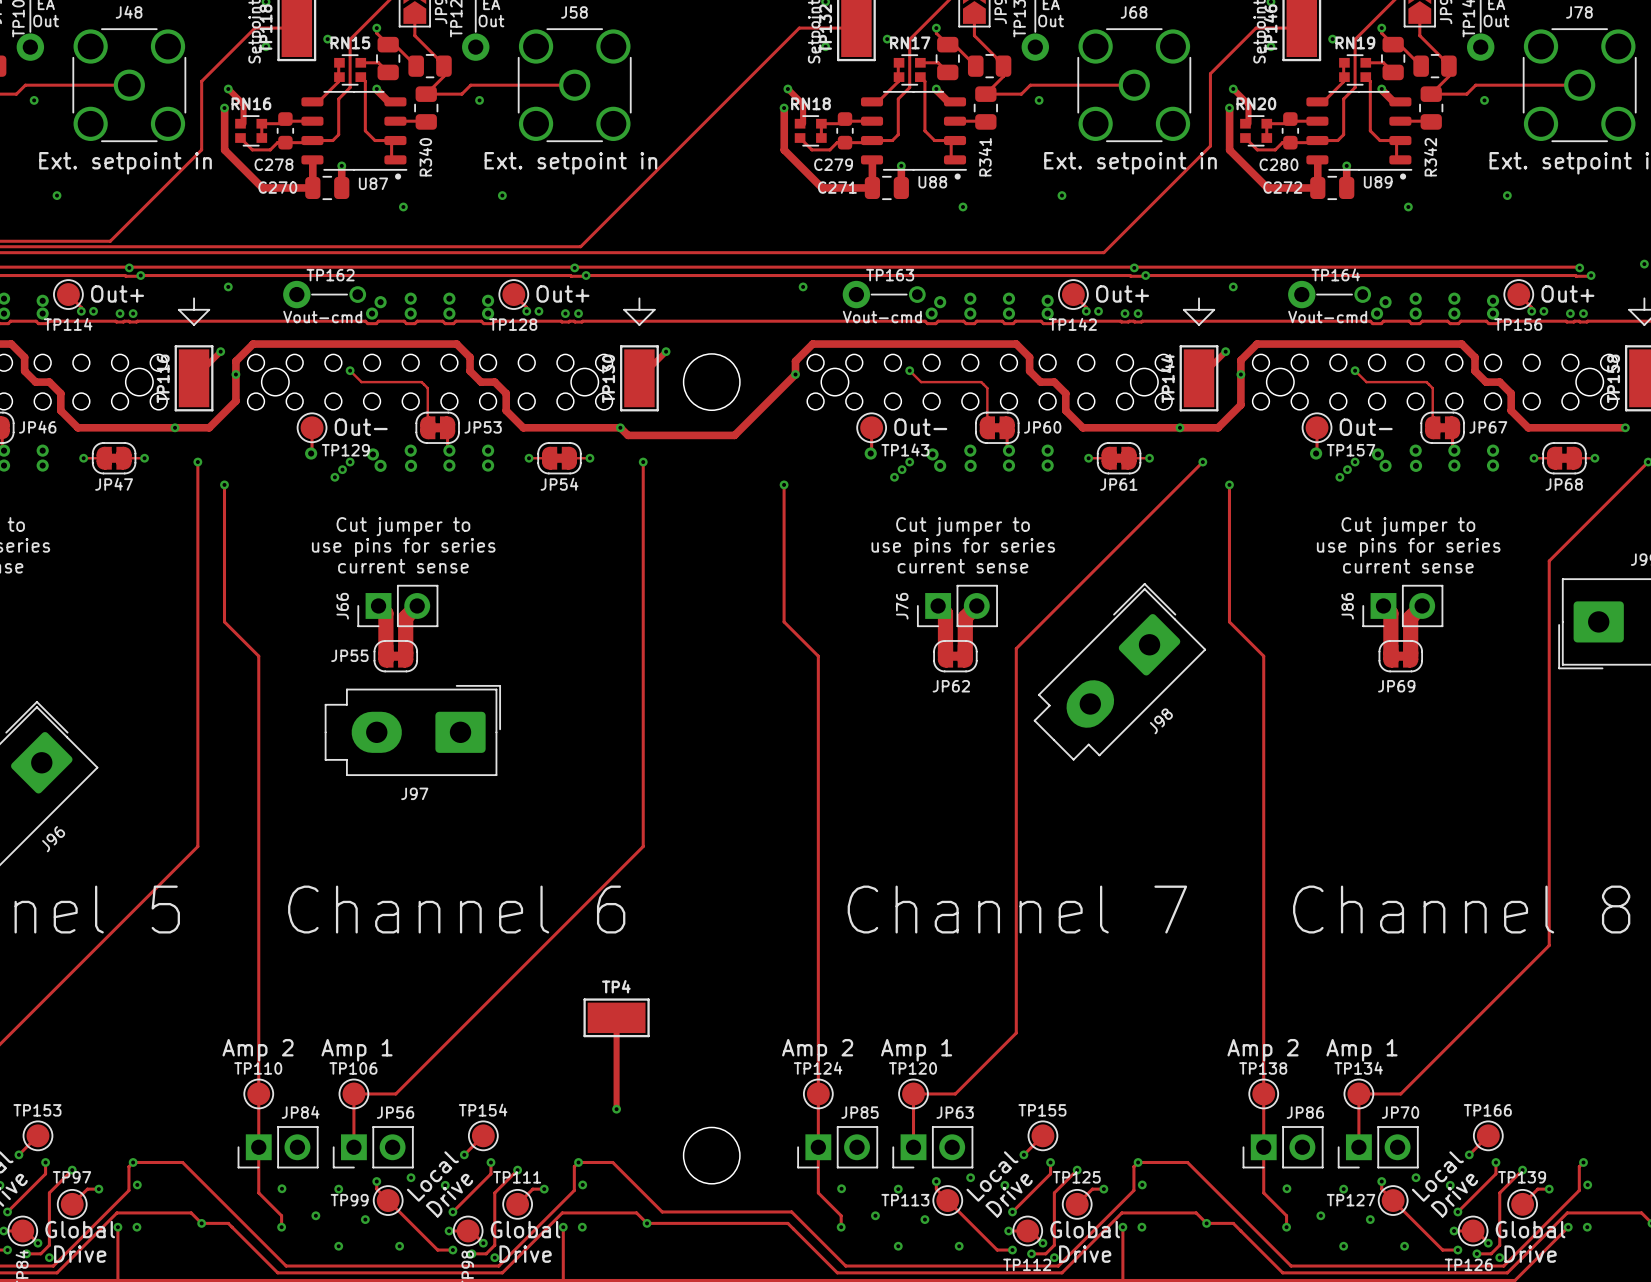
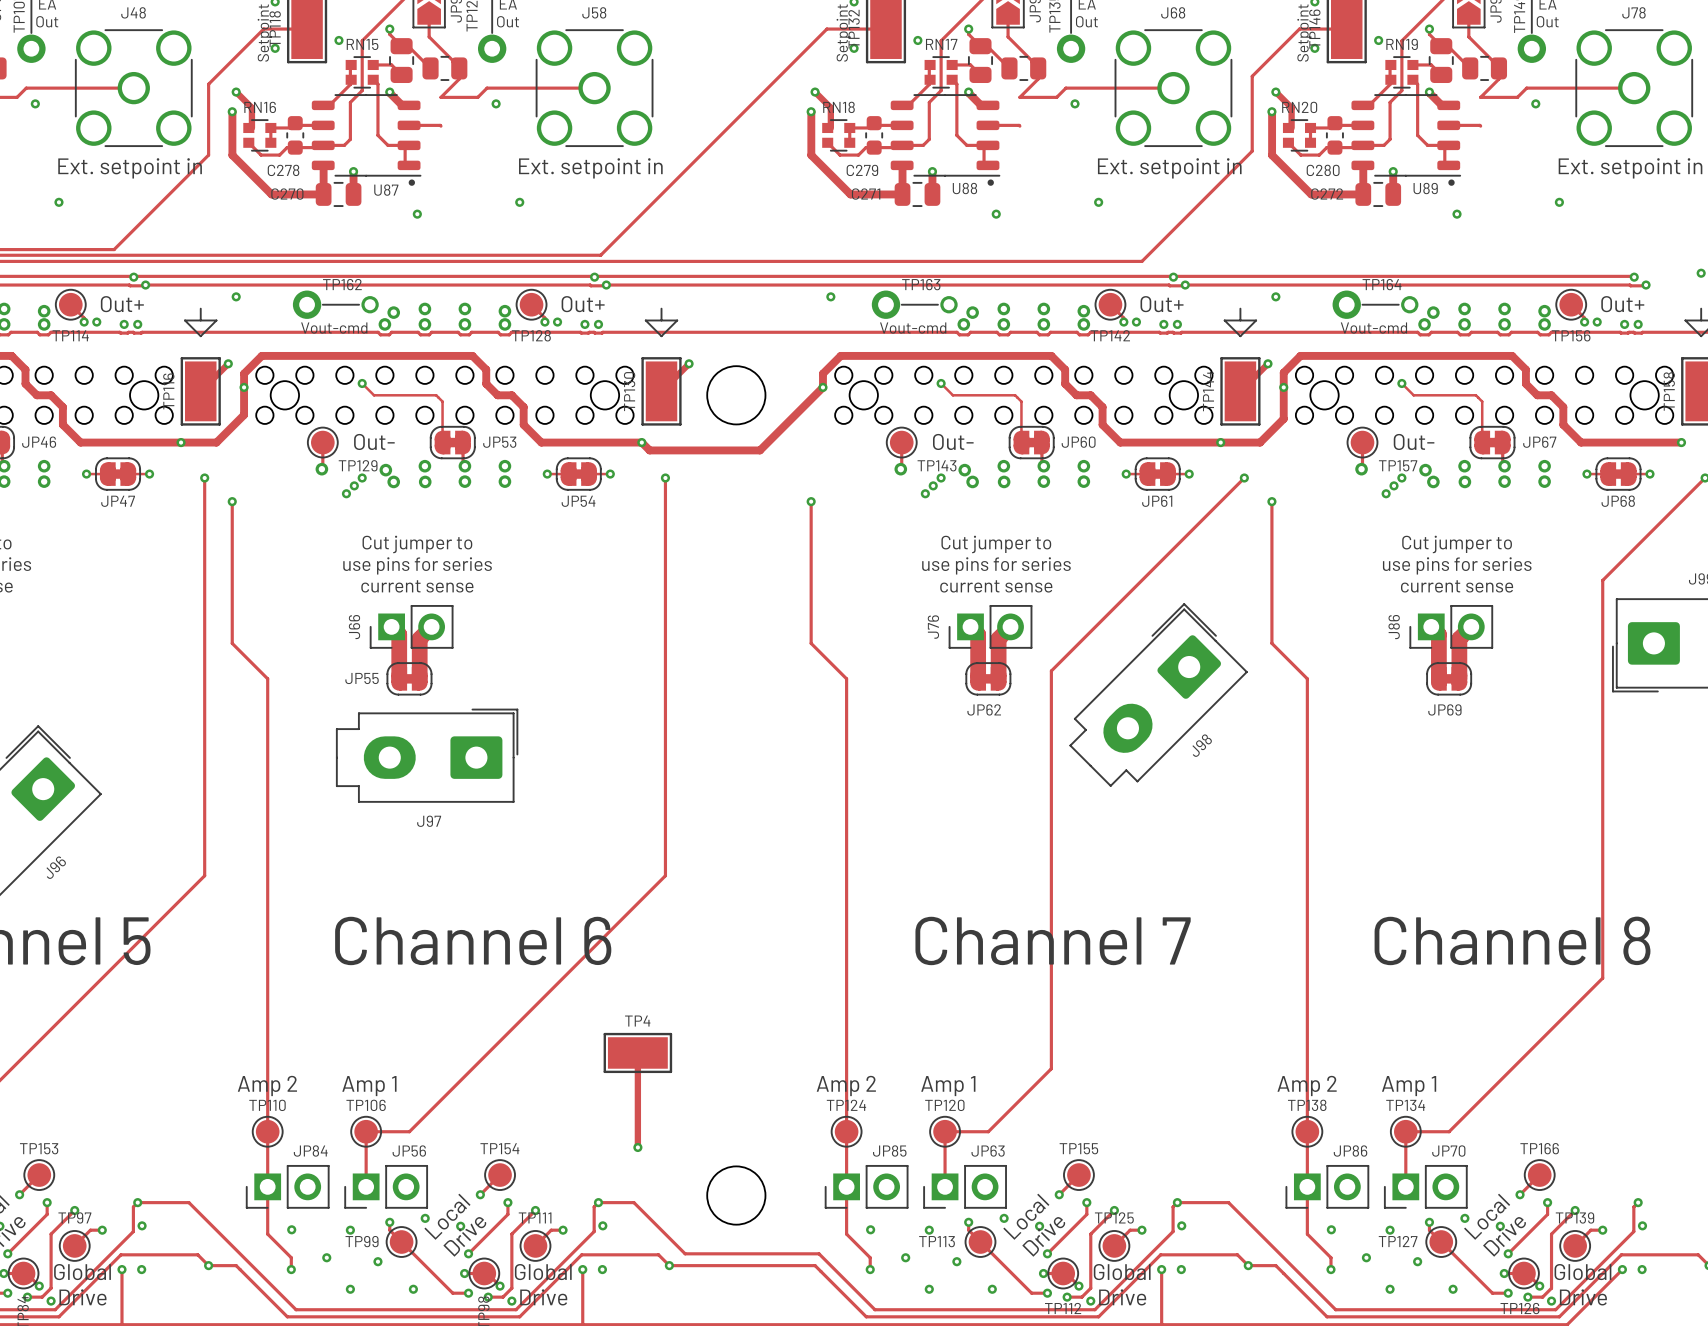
R340: (426, 108) -> none
R341: (985, 108) -> none
R342: (1431, 108) -> none

